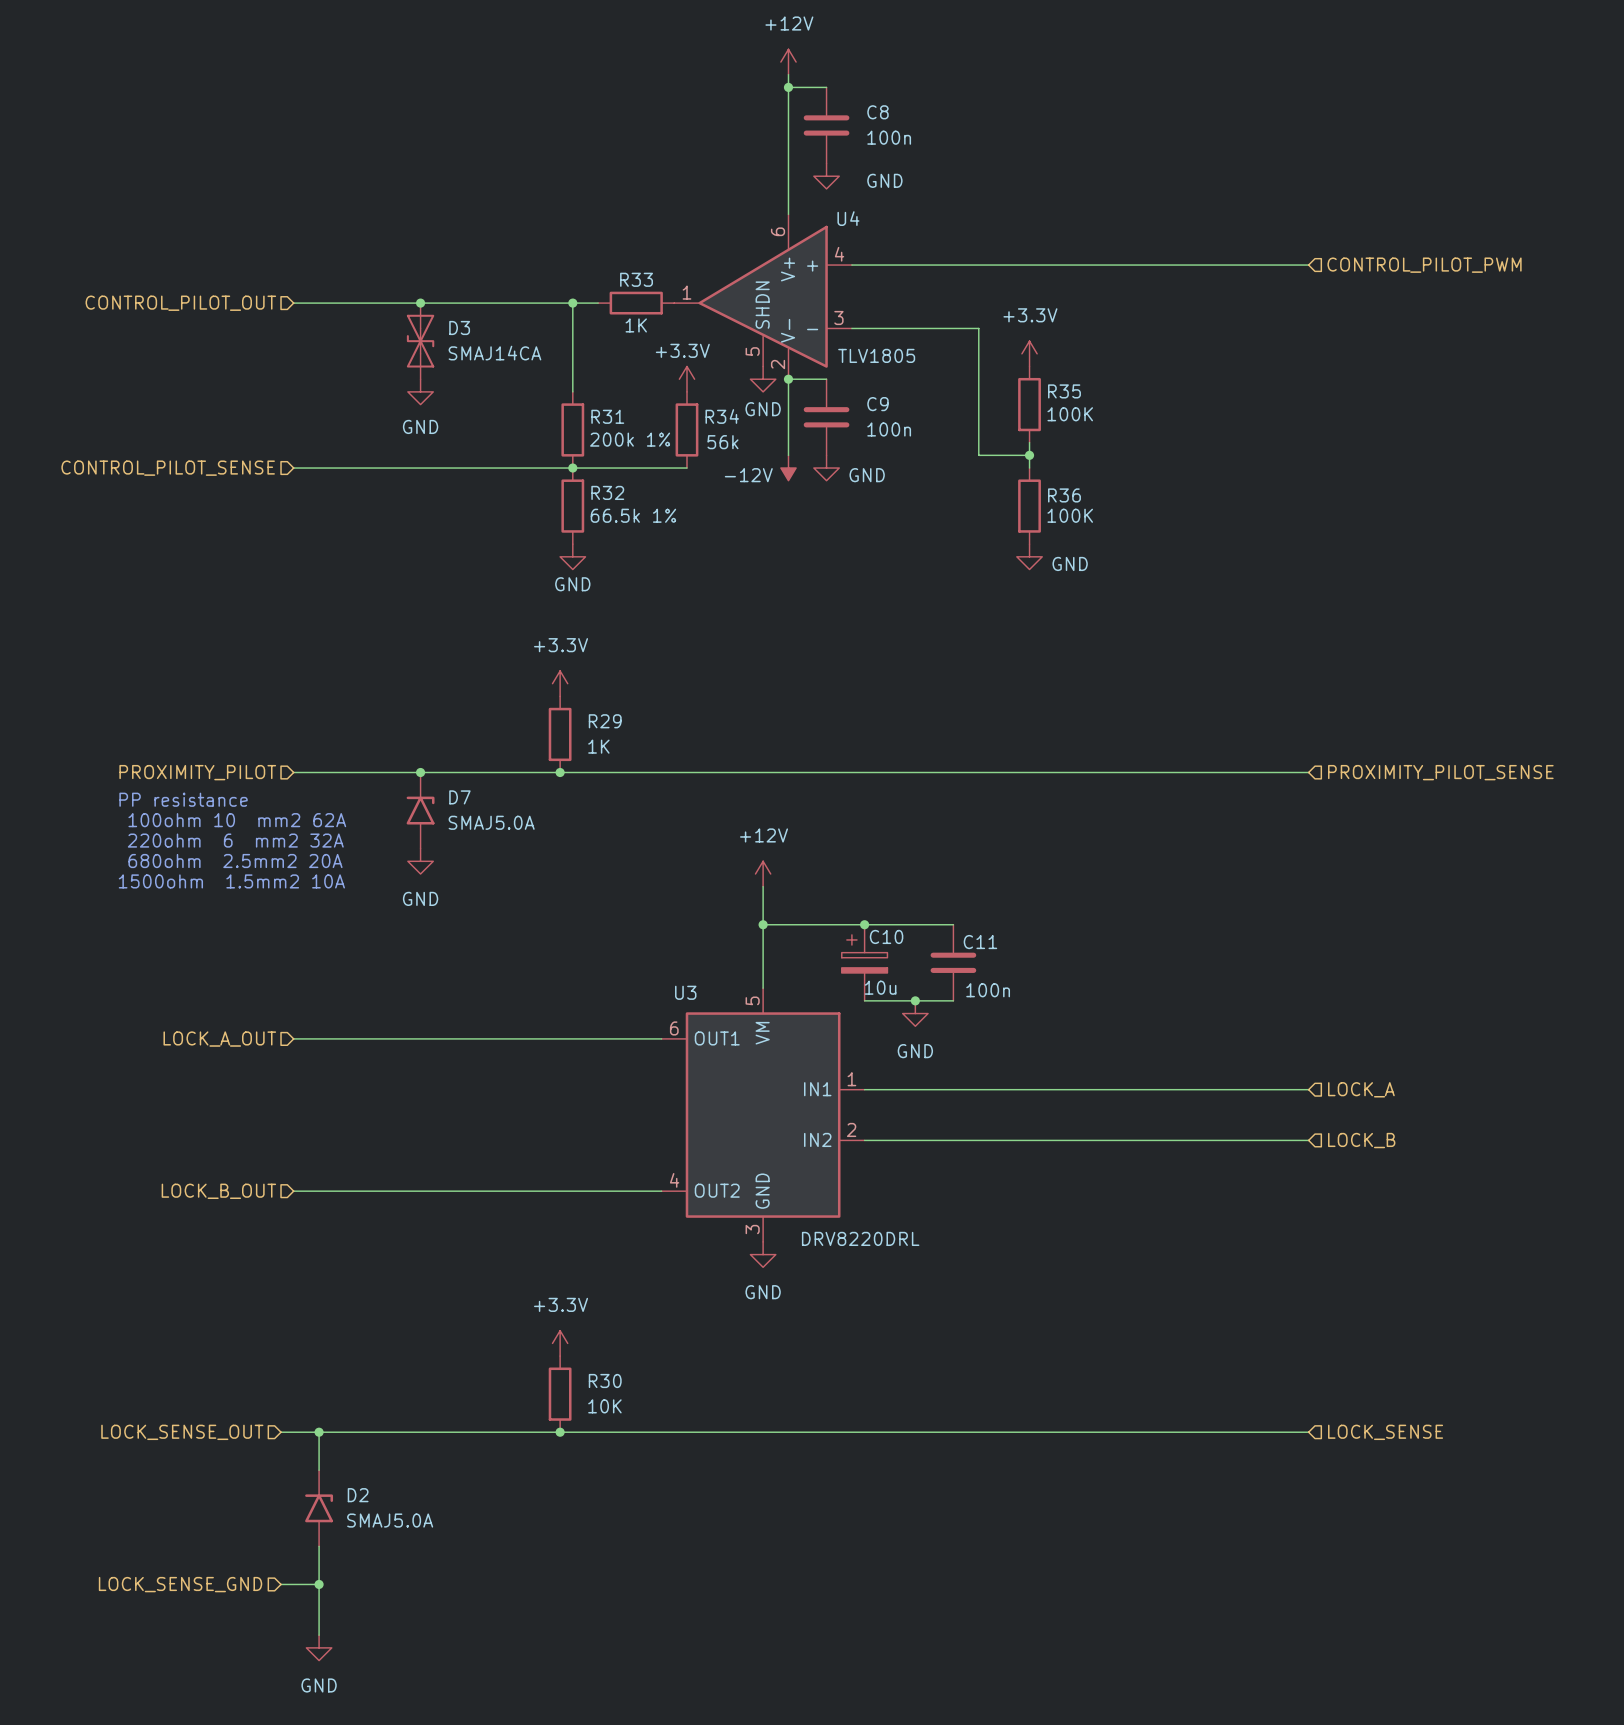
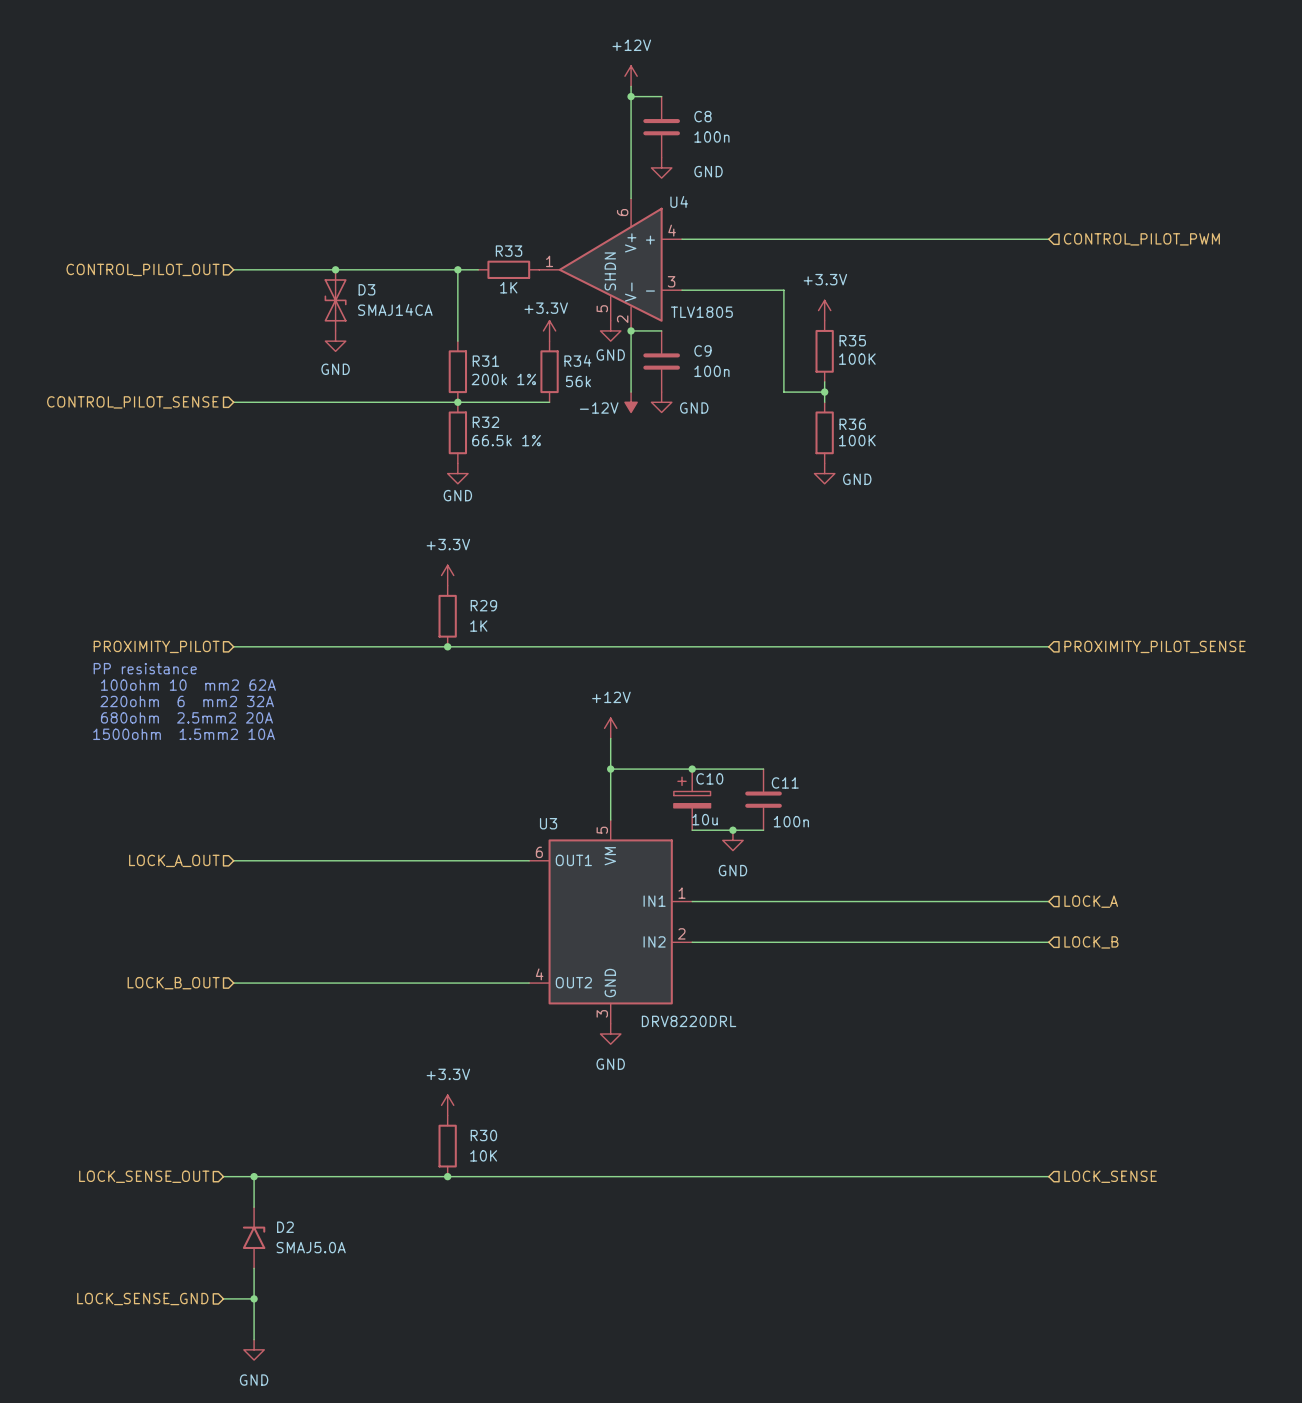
junction: (420, 772) -> none
D7: SMAJ5.0A (420, 810) -> none
power symbol: GND (420, 861) -> none

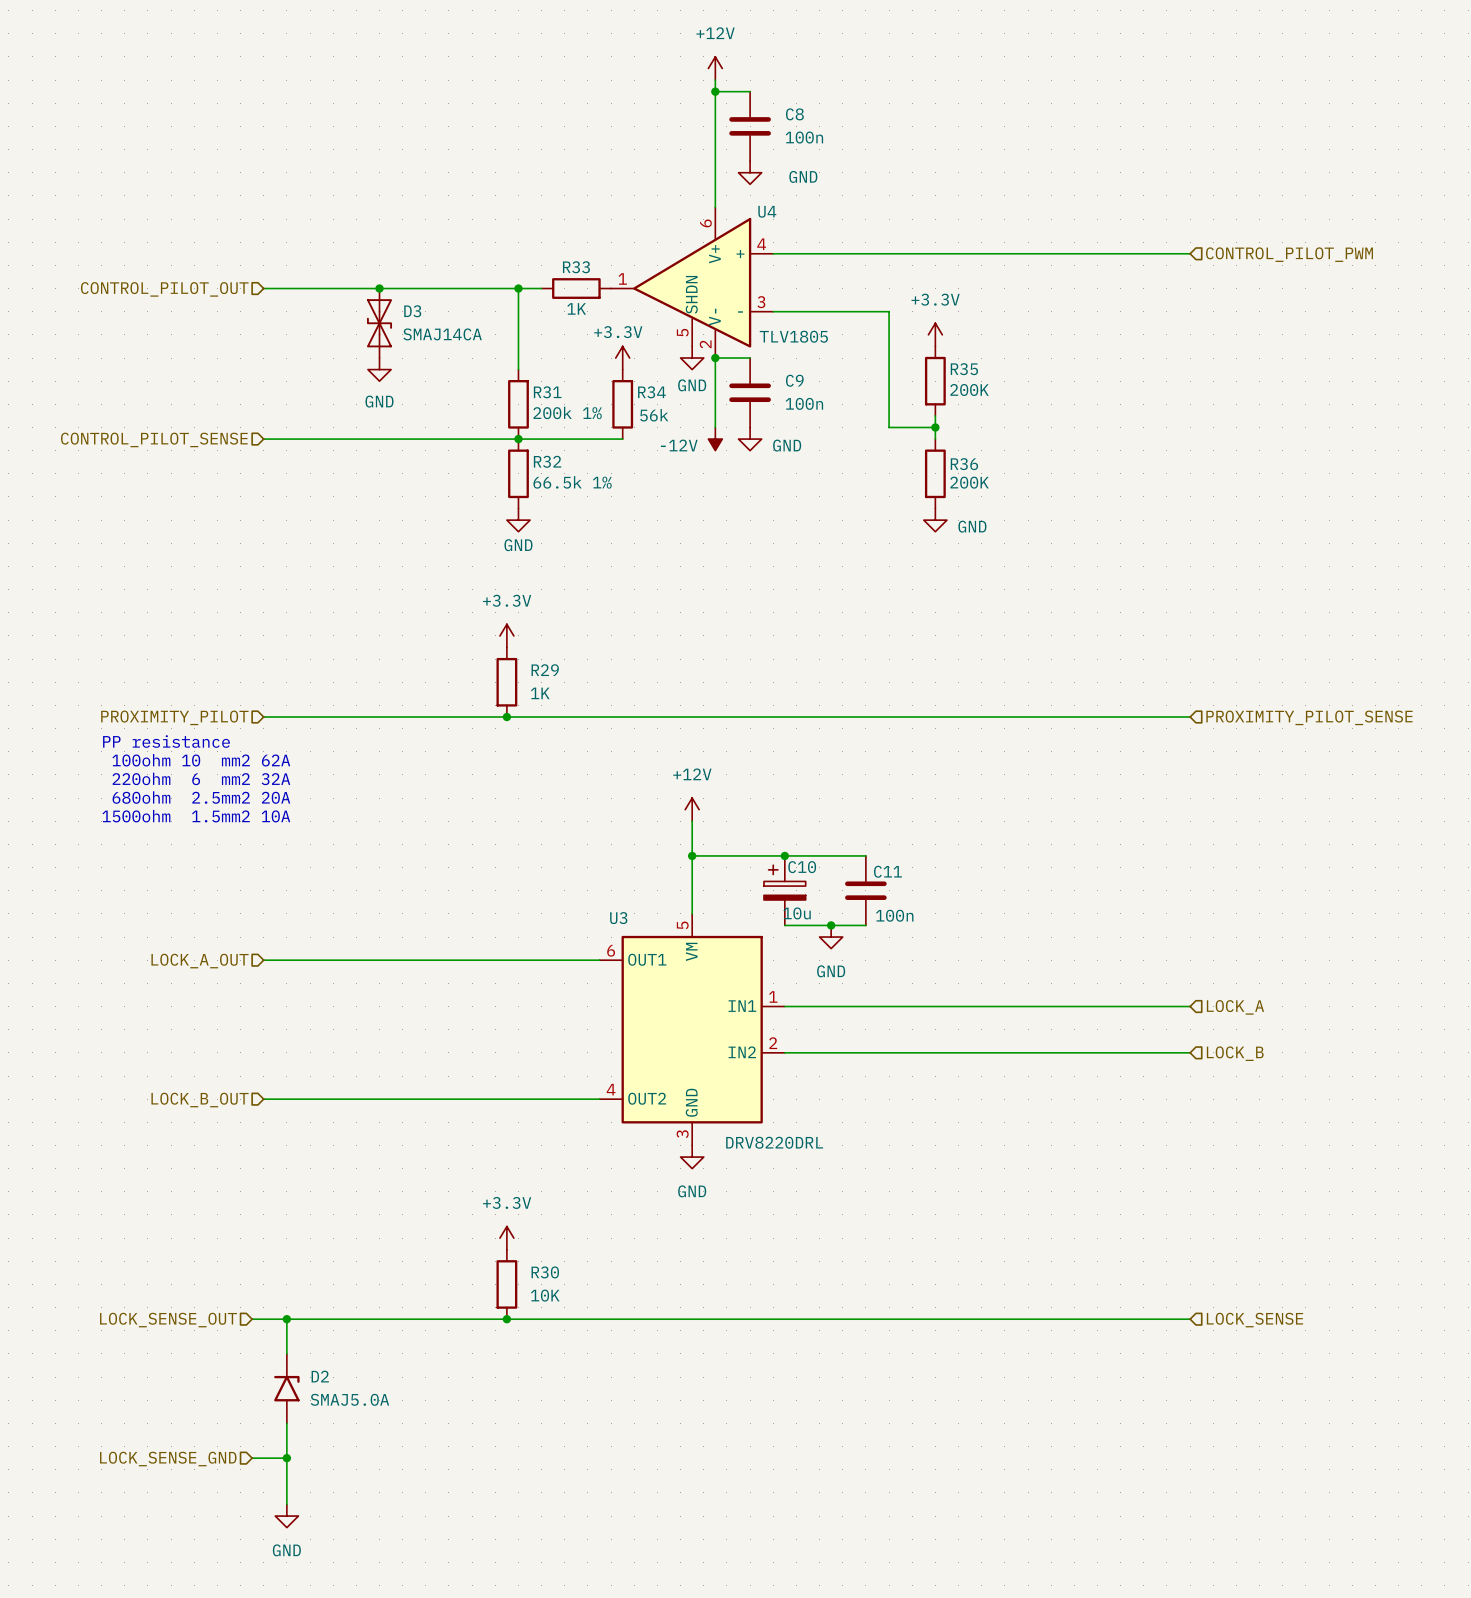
R35 value: 100K (857, 359) -> 200K (969, 390)
R36 value: 100K (857, 440) -> 200K (969, 482)

